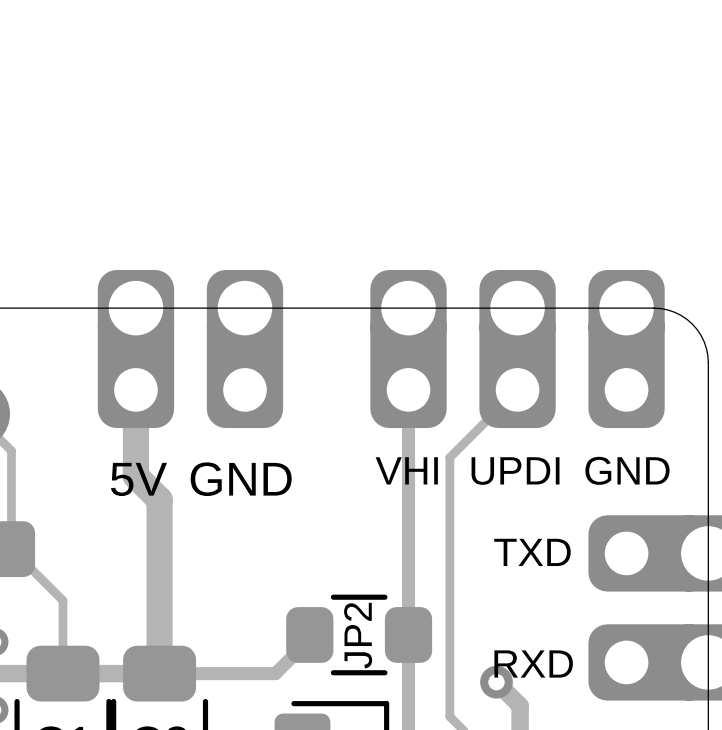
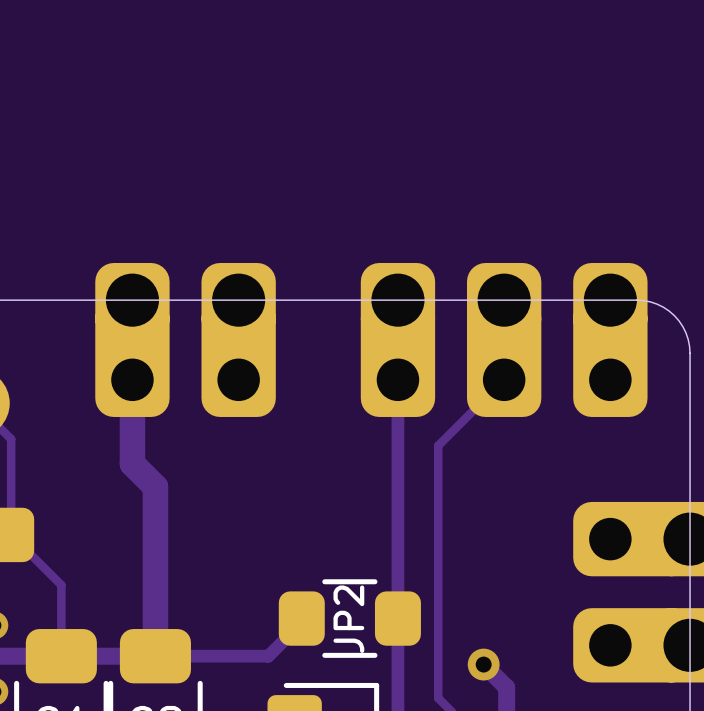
text: VHI (406, 470) -> none
text: GND (627, 470) -> none
text: UPDI (515, 471) -> none
text: 5V (138, 479) -> none
text: GND (241, 479) -> none
text: TXD (532, 552) -> none
text: RXD (533, 664) -> none

